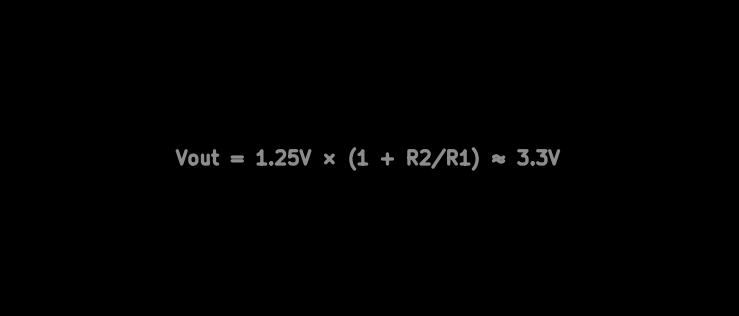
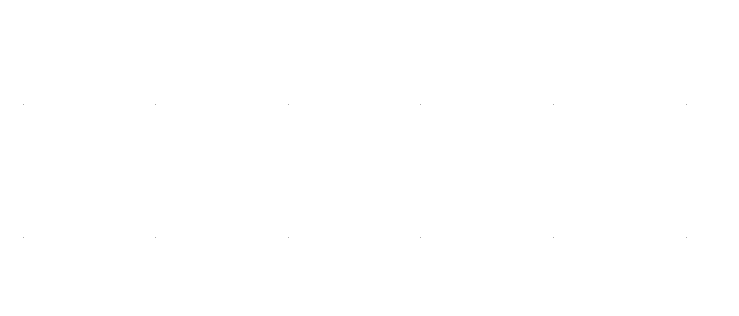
text: Vout = 1.25V × (1 + R2/R1) ≈ 3.3V (367, 158) -> none

